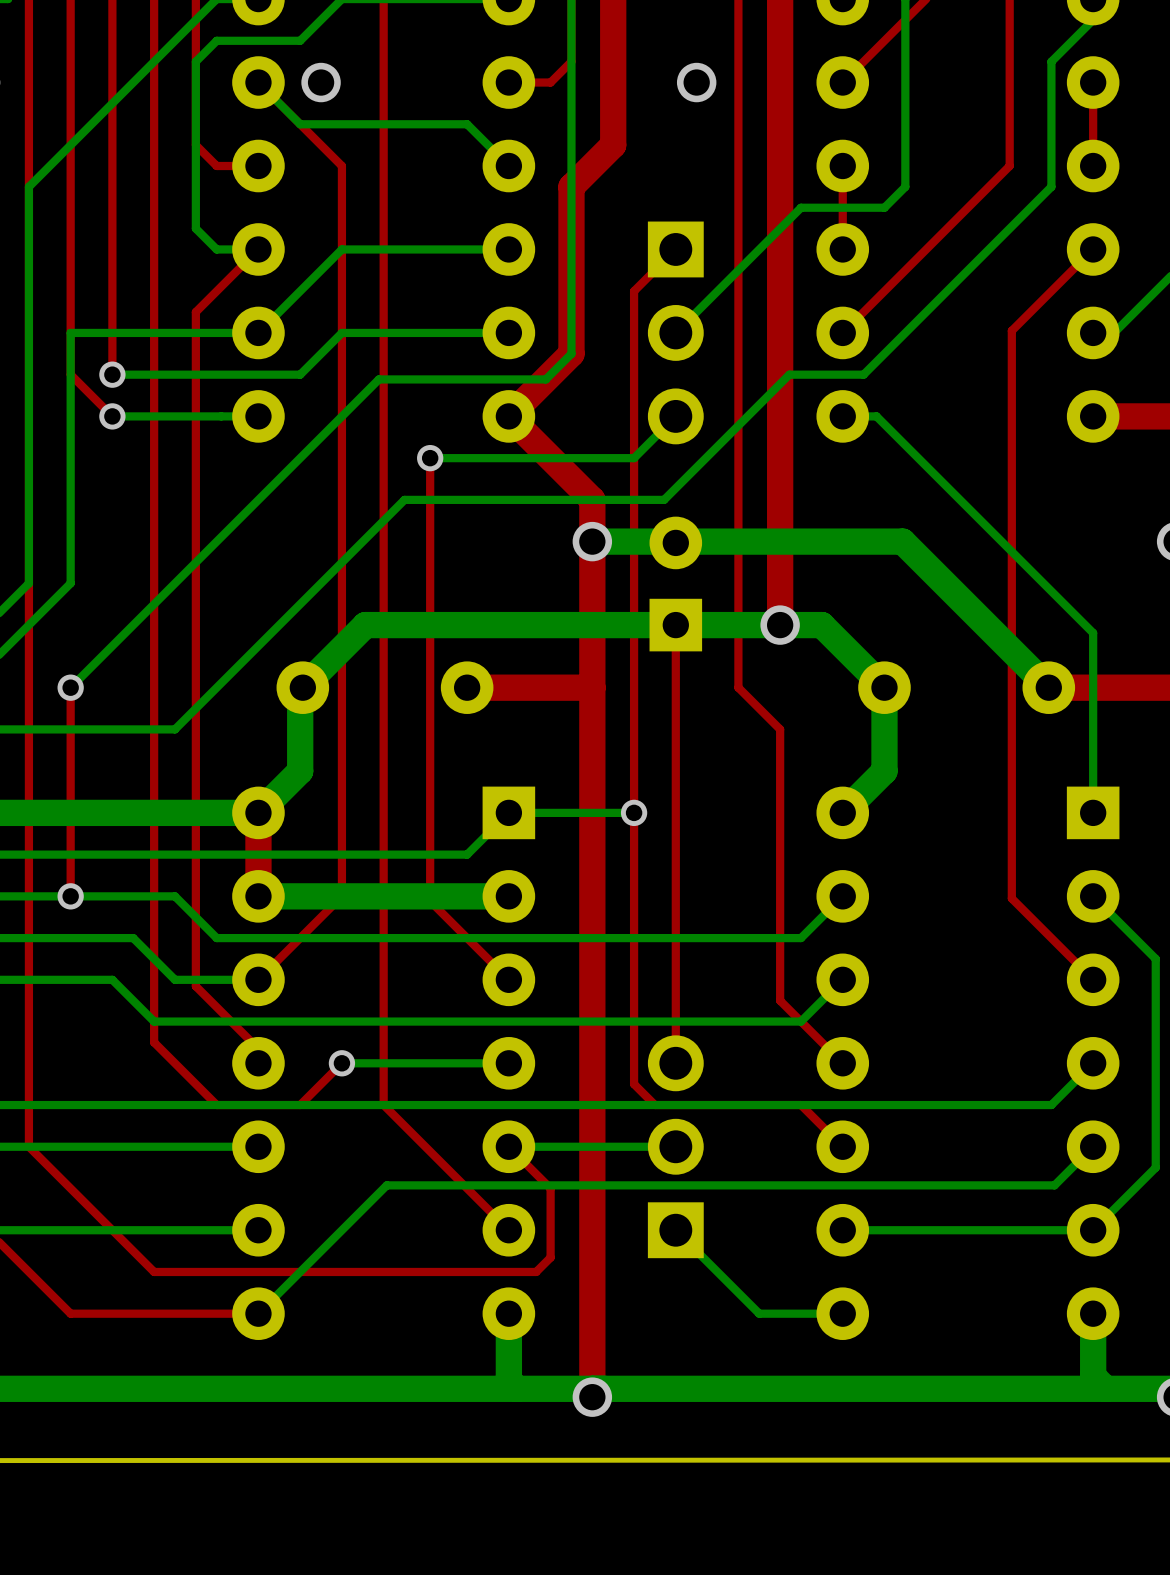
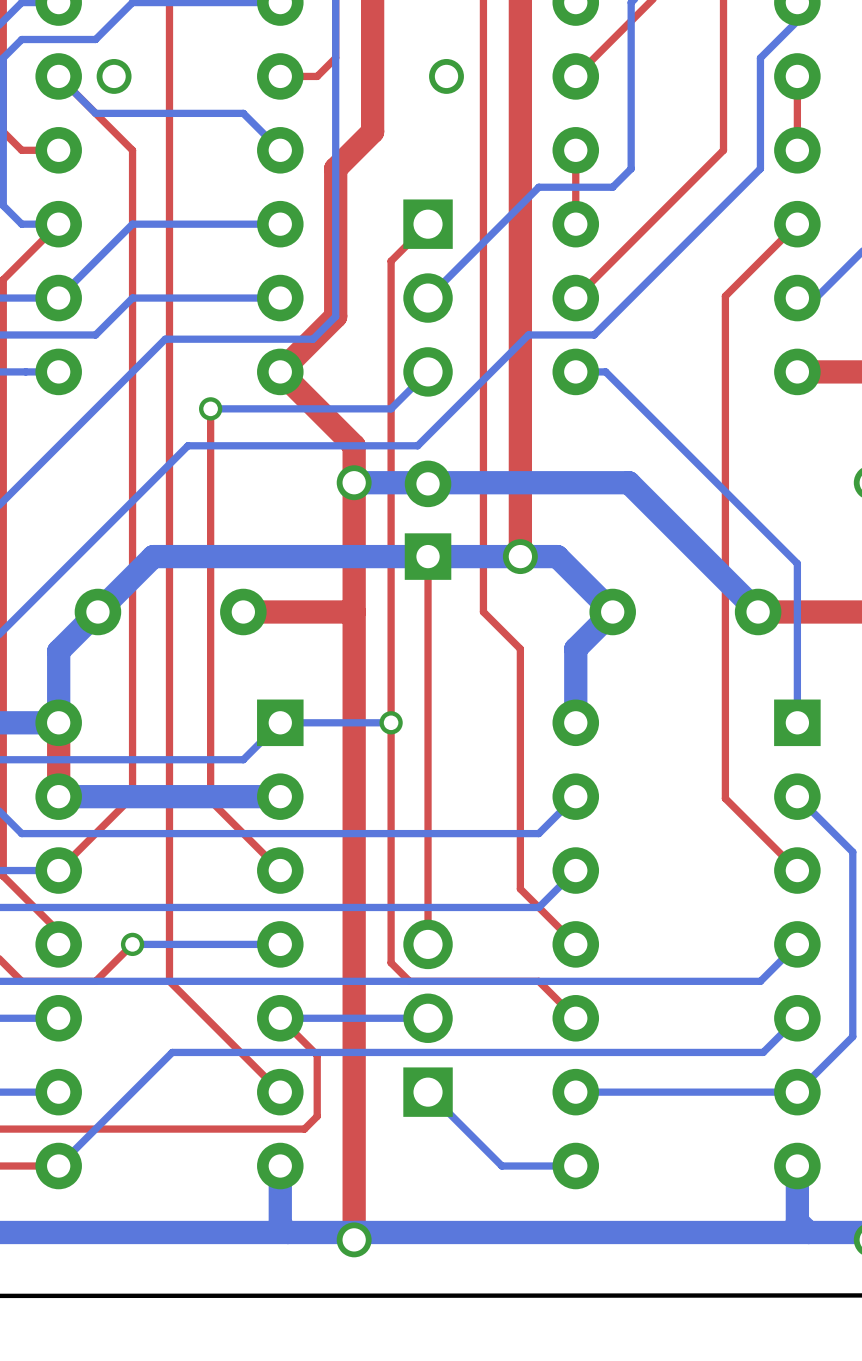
bottom track: (884, 687) (884, 771) (842, 812) -> (612, 611) (575, 648) (575, 722)
bottom track: (300, 690) (300, 771) (258, 812) -> (95, 614) (58, 651) (58, 722)

